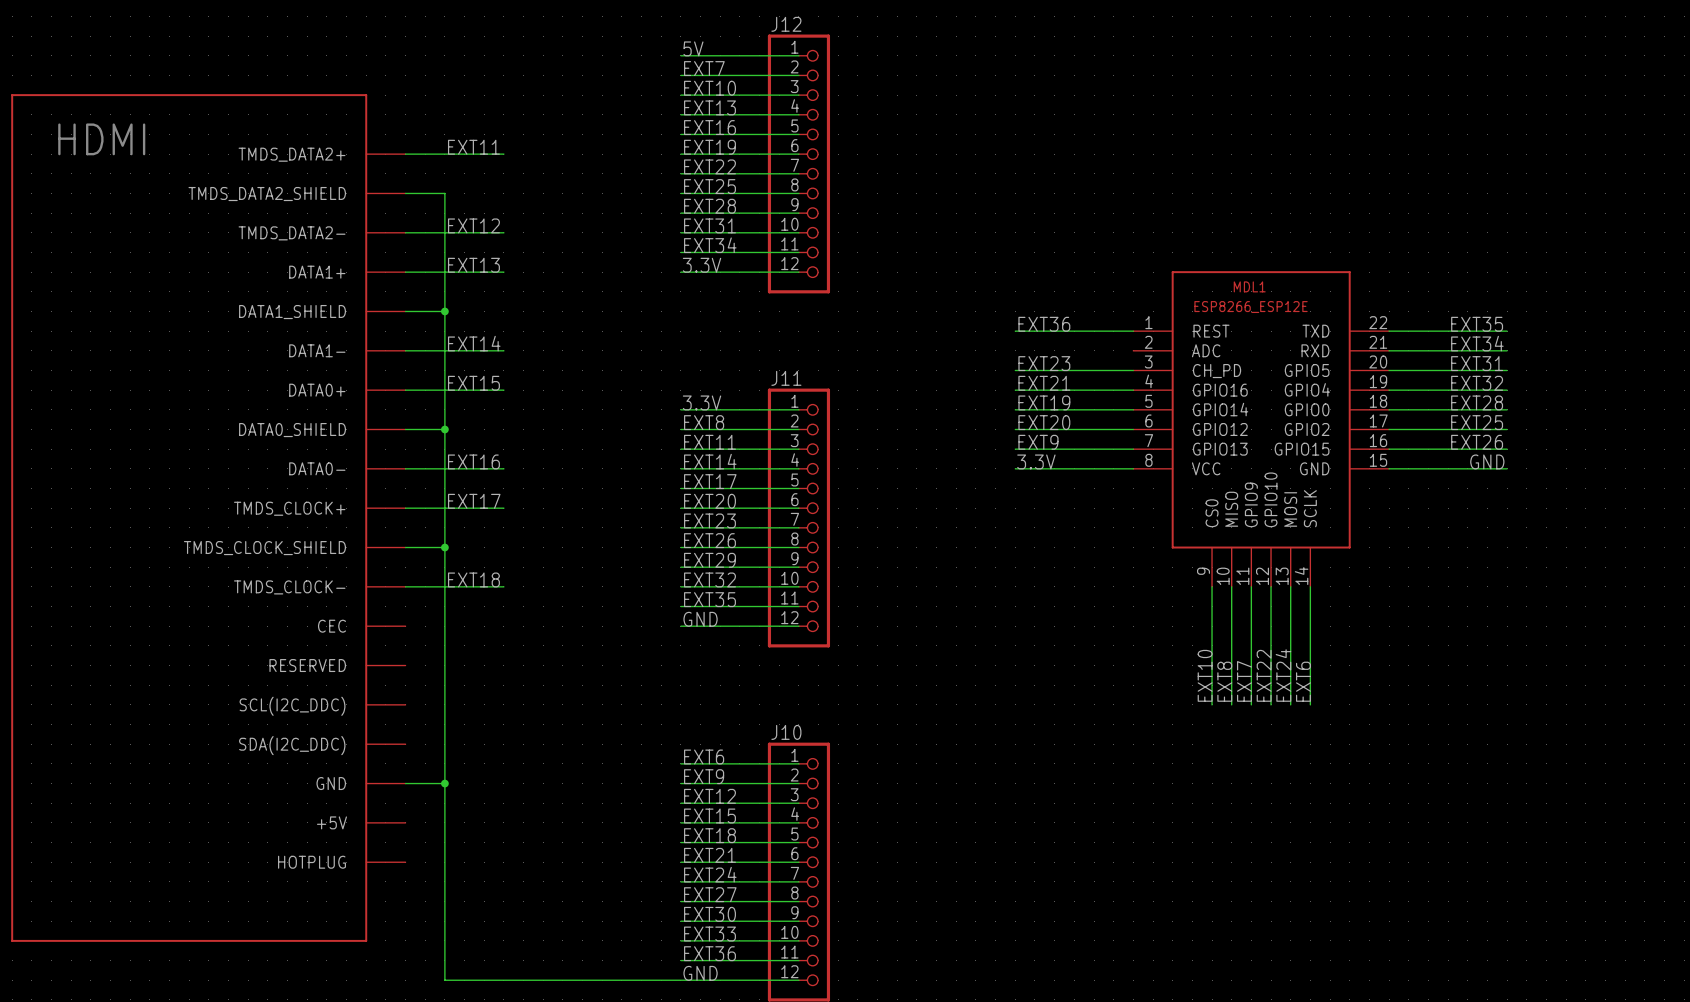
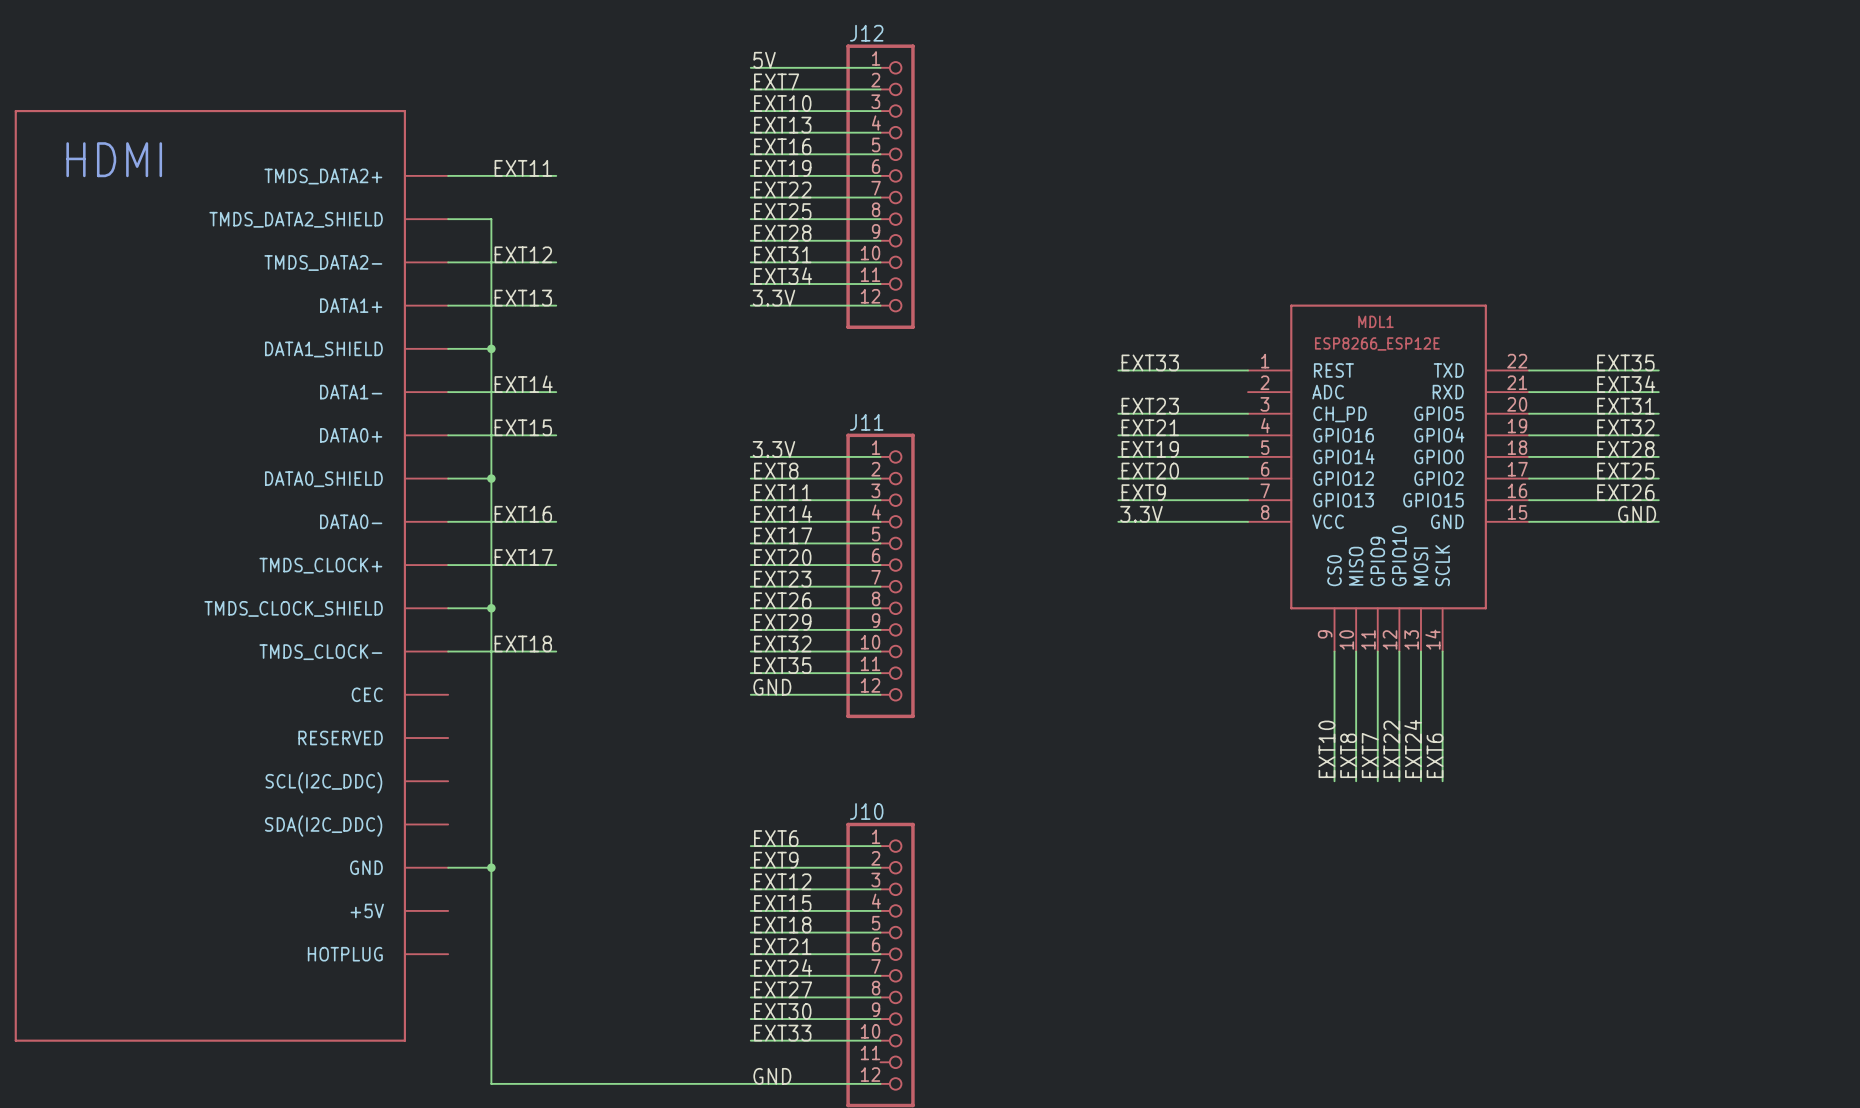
label: EXT36 (1044, 324) -> EXT33 (1150, 362)
label: EXT36 (709, 953) -> none
wire: (680, 960) (798, 960) -> none

